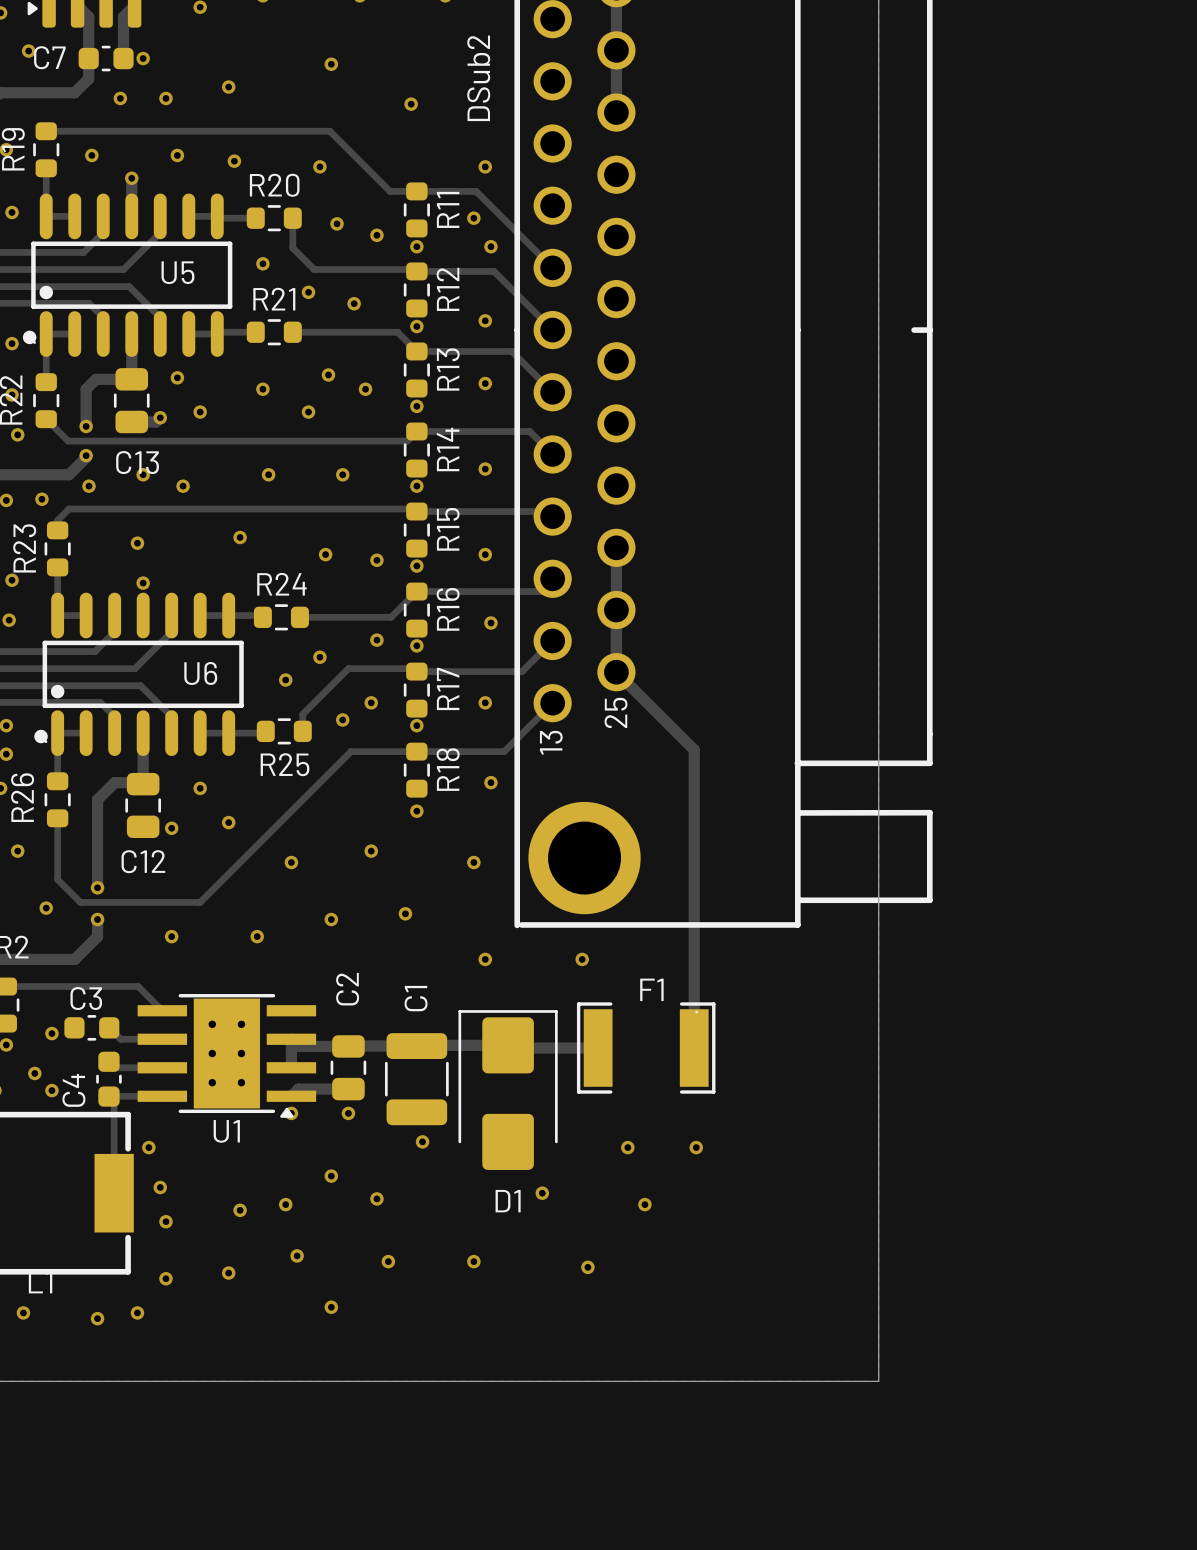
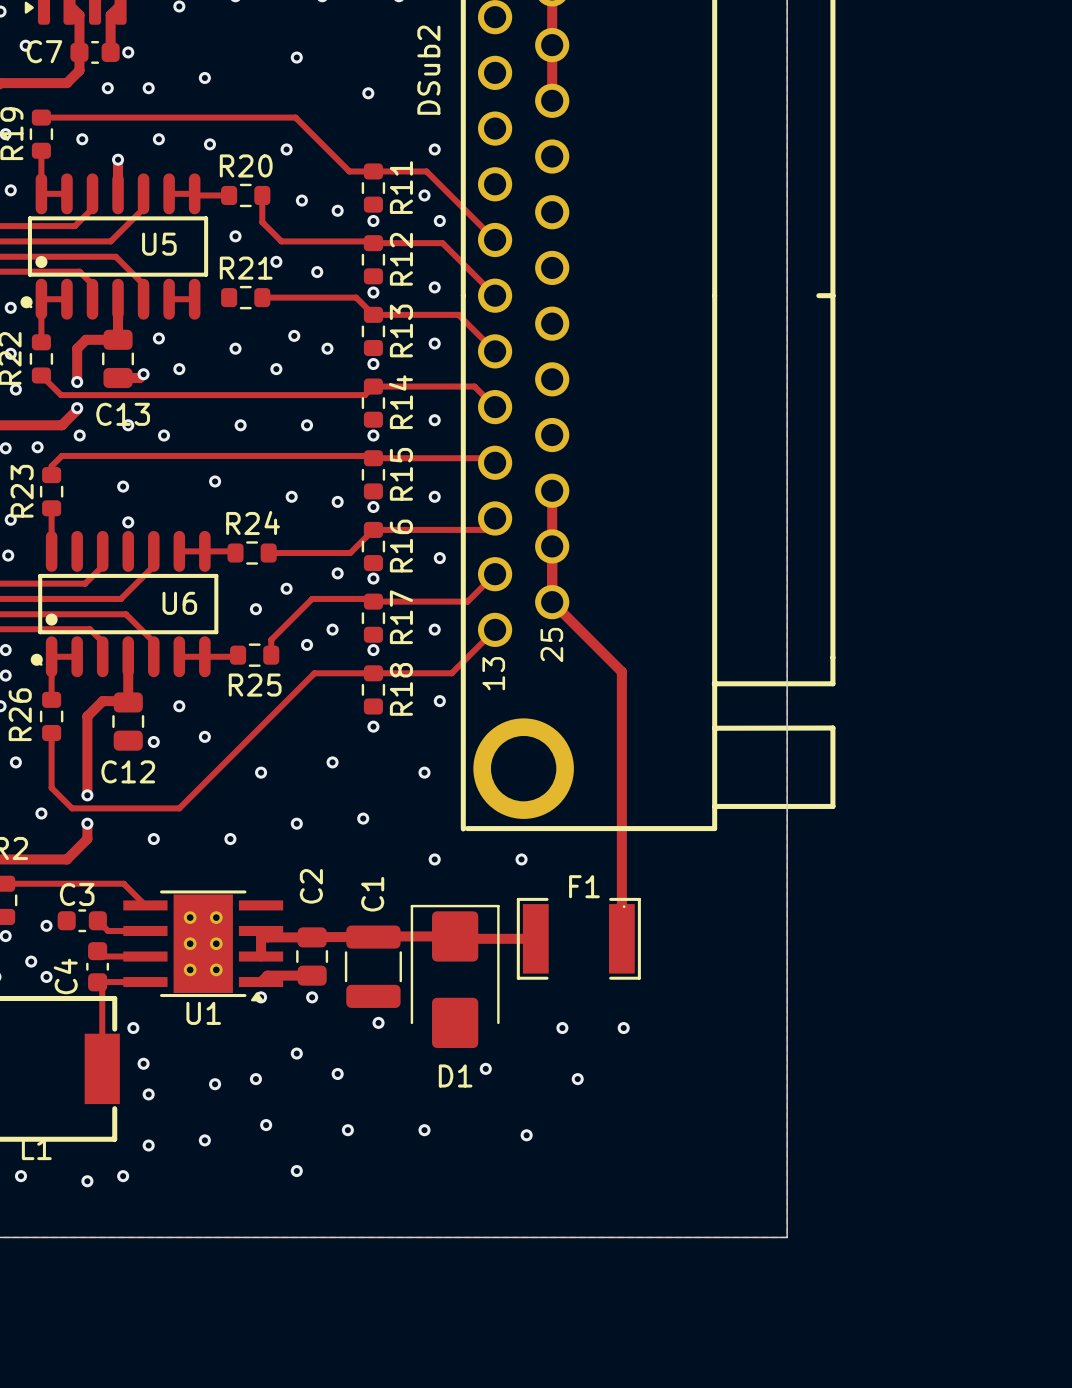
track: (255, 332) (219, 332) (217, 334) -> none
track: (57, 615) (86, 615) -> none

